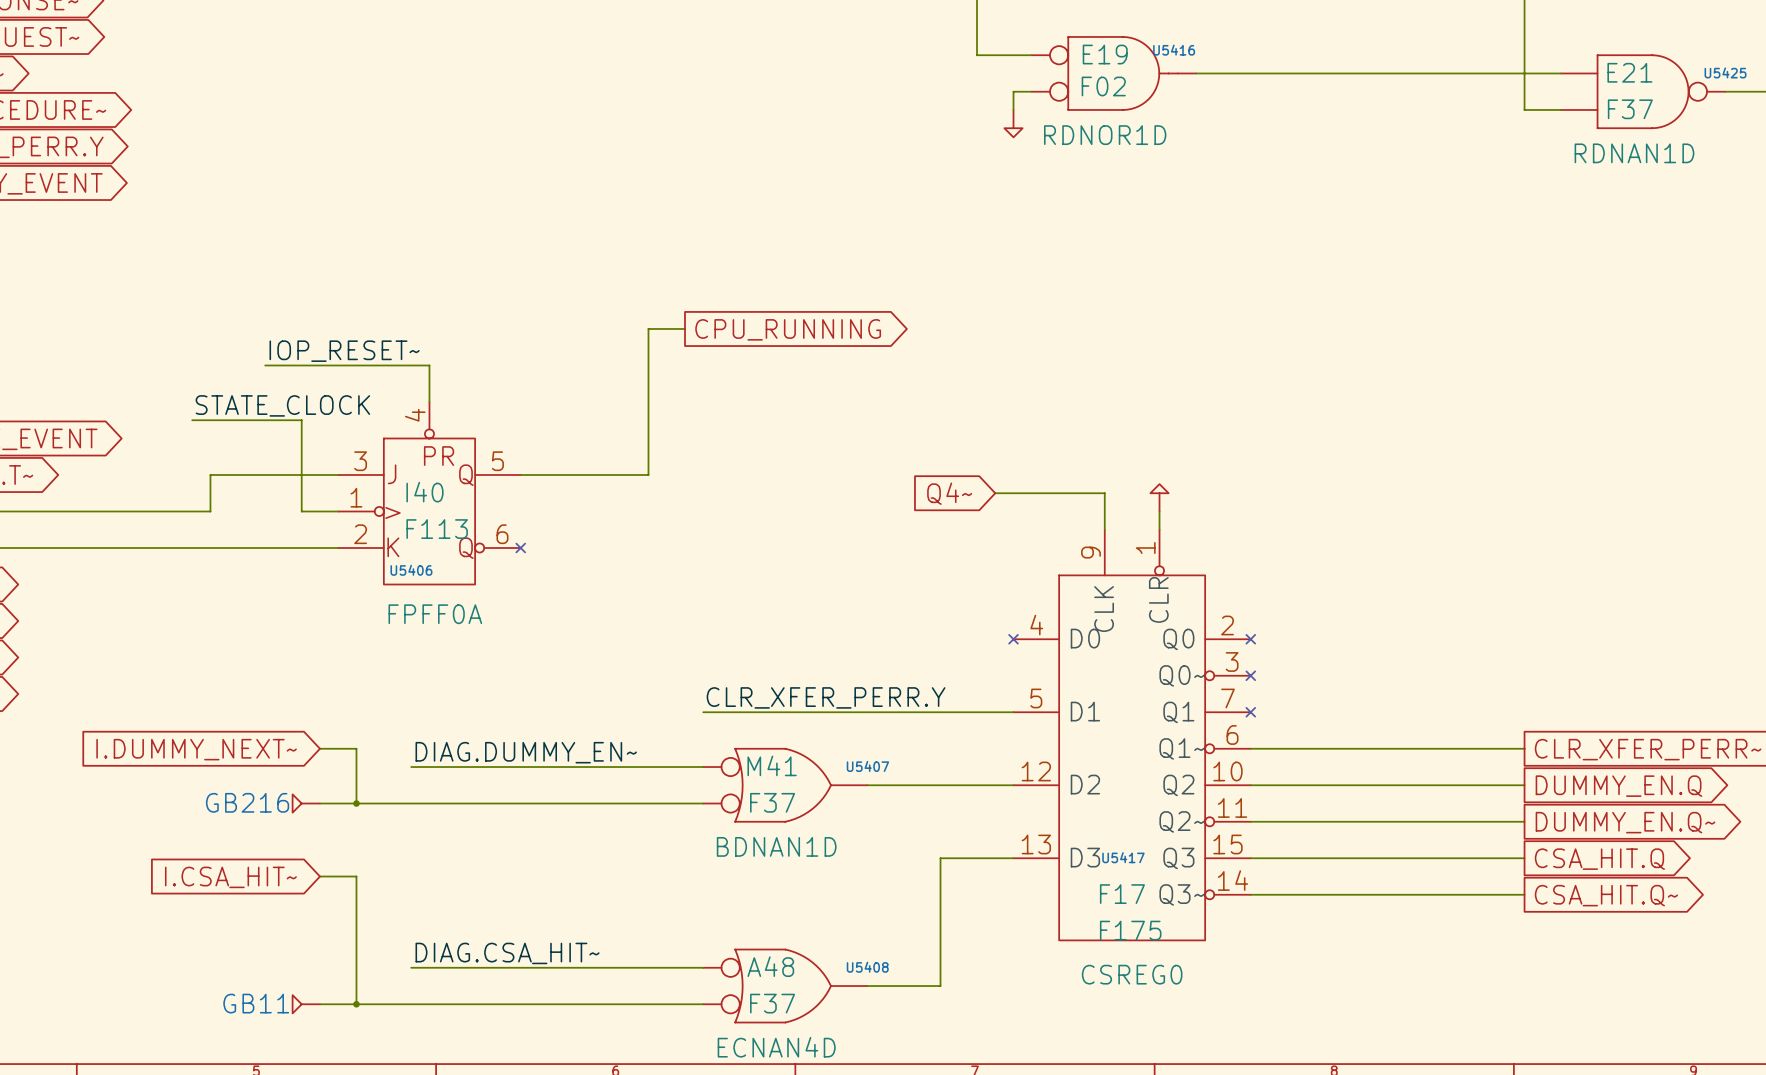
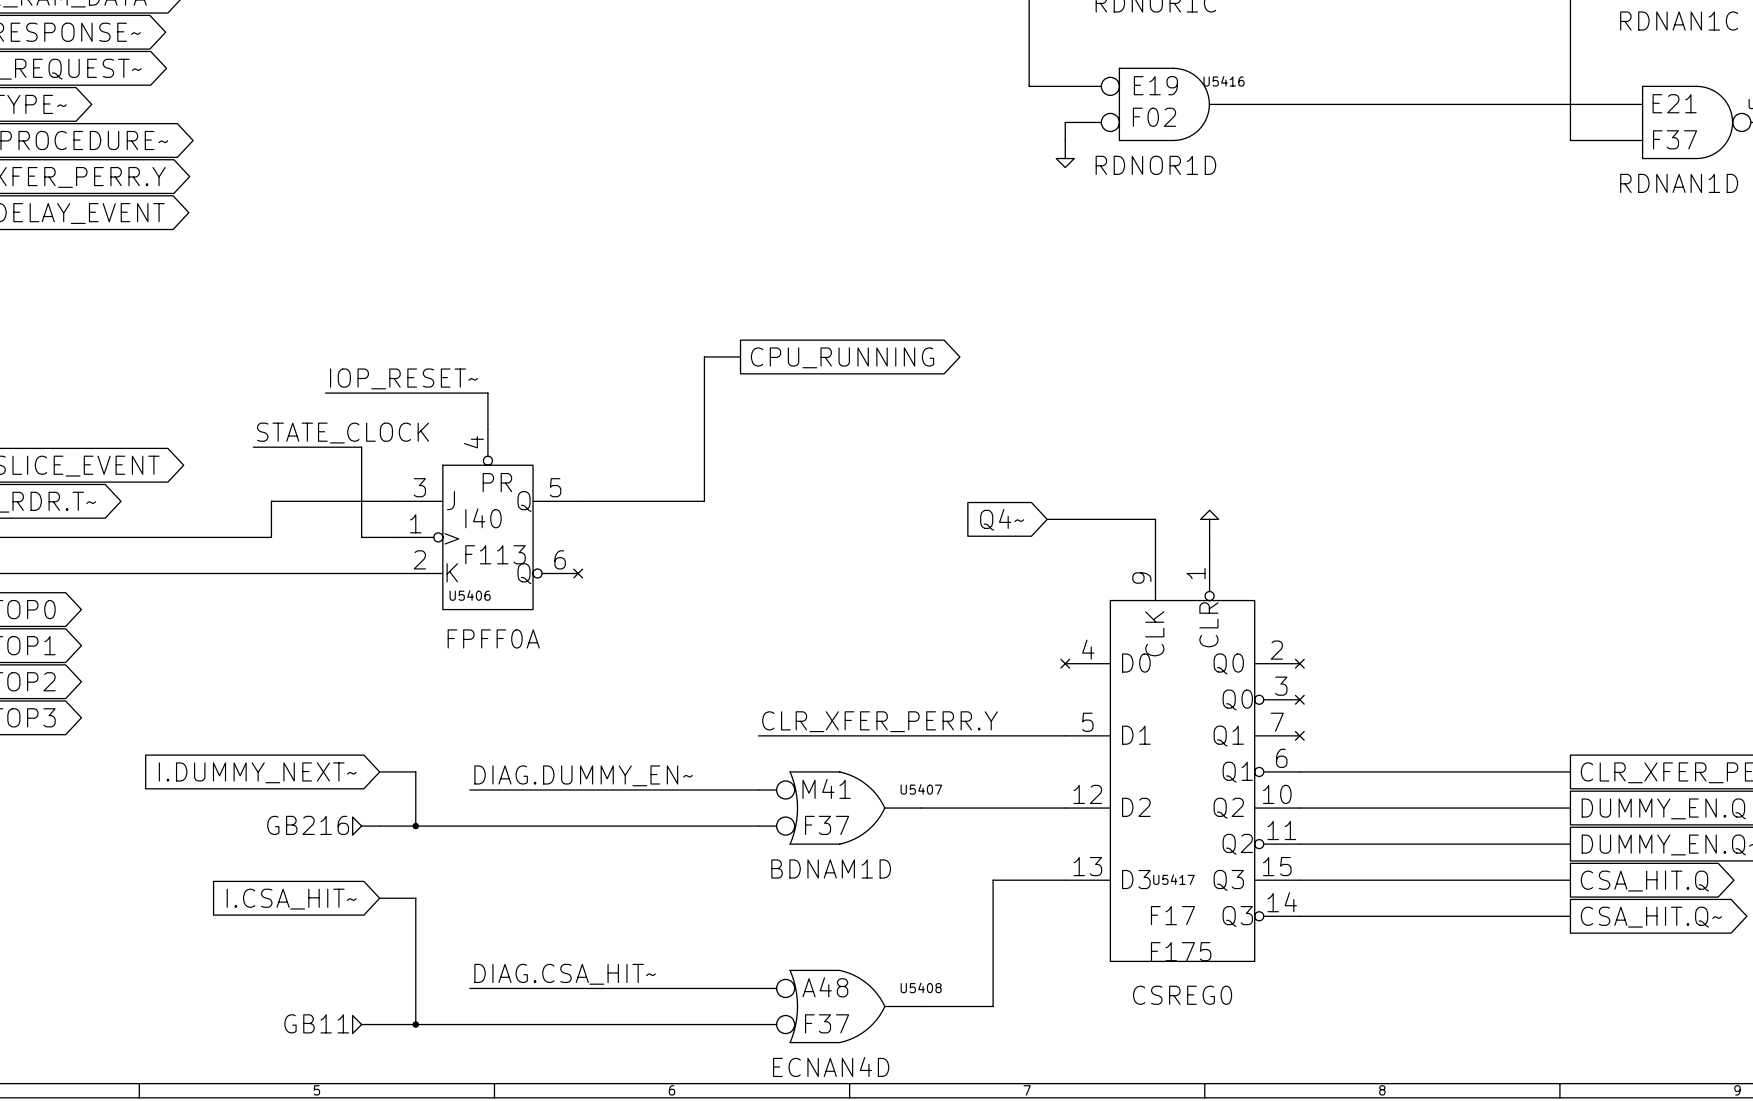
U5417 pin name: Q0~ (1181, 675) -> Q0 (1237, 699)
U5417 pin name: Q1~ (1181, 748) -> Q1 (1237, 772)
U5417 pin name: Q2~ (1181, 821) -> Q2 (1237, 844)
U5407 text: BDNAN1D (776, 846) -> BDNAM1D (831, 868)
U5417 pin name: Q3~ (1181, 894) -> Q3 (1237, 916)

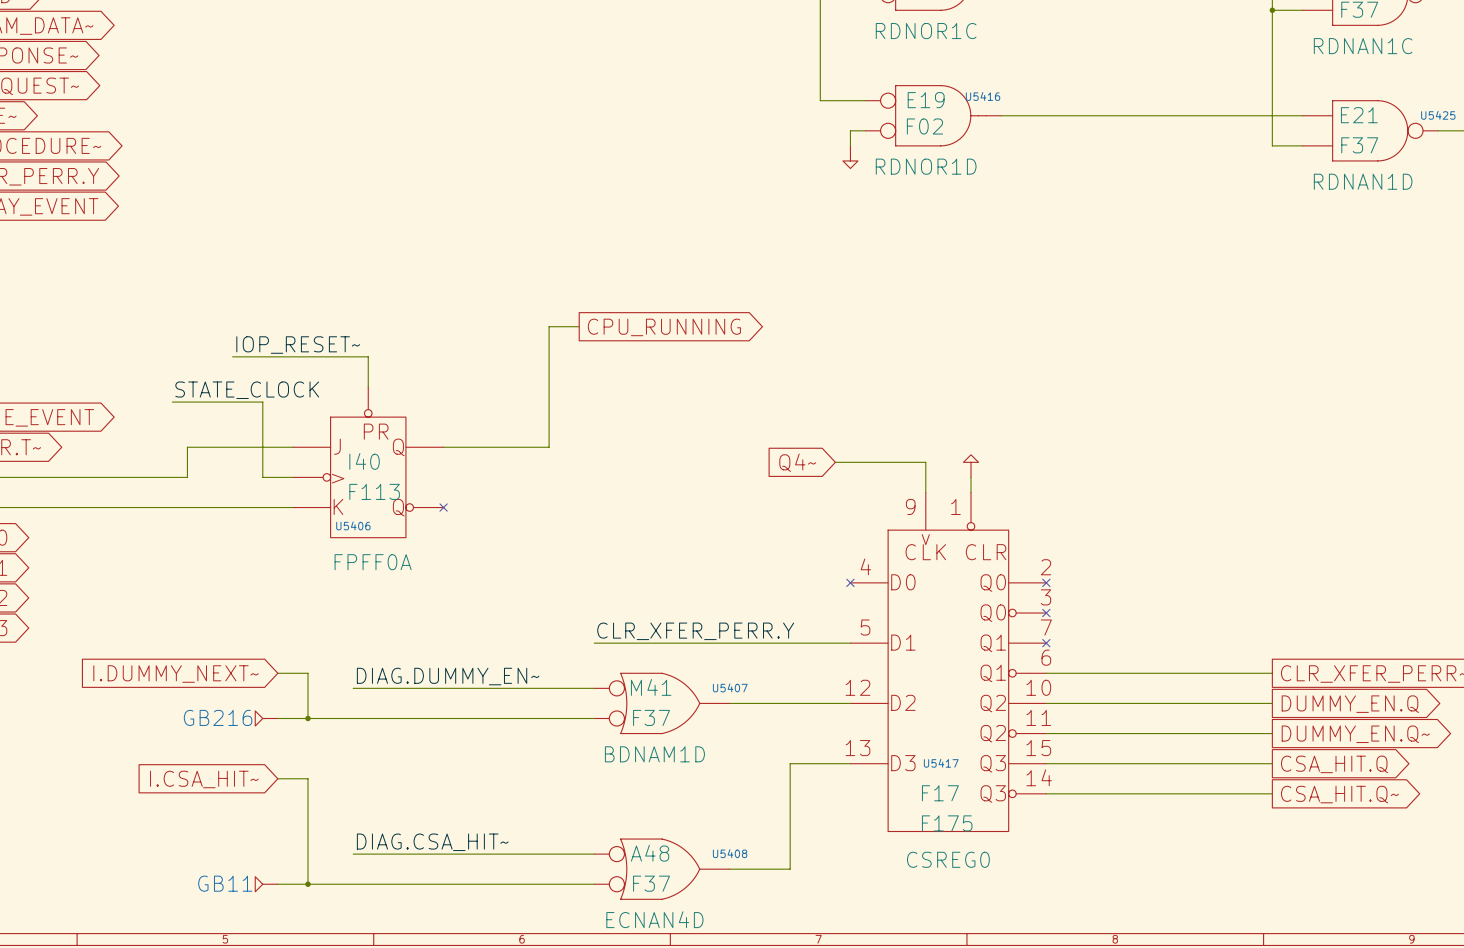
U5406 pin number: 4 (473, 442) -> none
U5406 pin number: 3 (419, 487) -> none
U5406 pin number: 5 (555, 487) -> none
U5406 pin number: 1 (415, 523) -> none
U5417 symbol: [1065, 555, 1300, 962] -> [850, 492, 1047, 832]
U5406 pin number: 2 (419, 559) -> none
U5406 pin number: 6 (560, 559) -> none

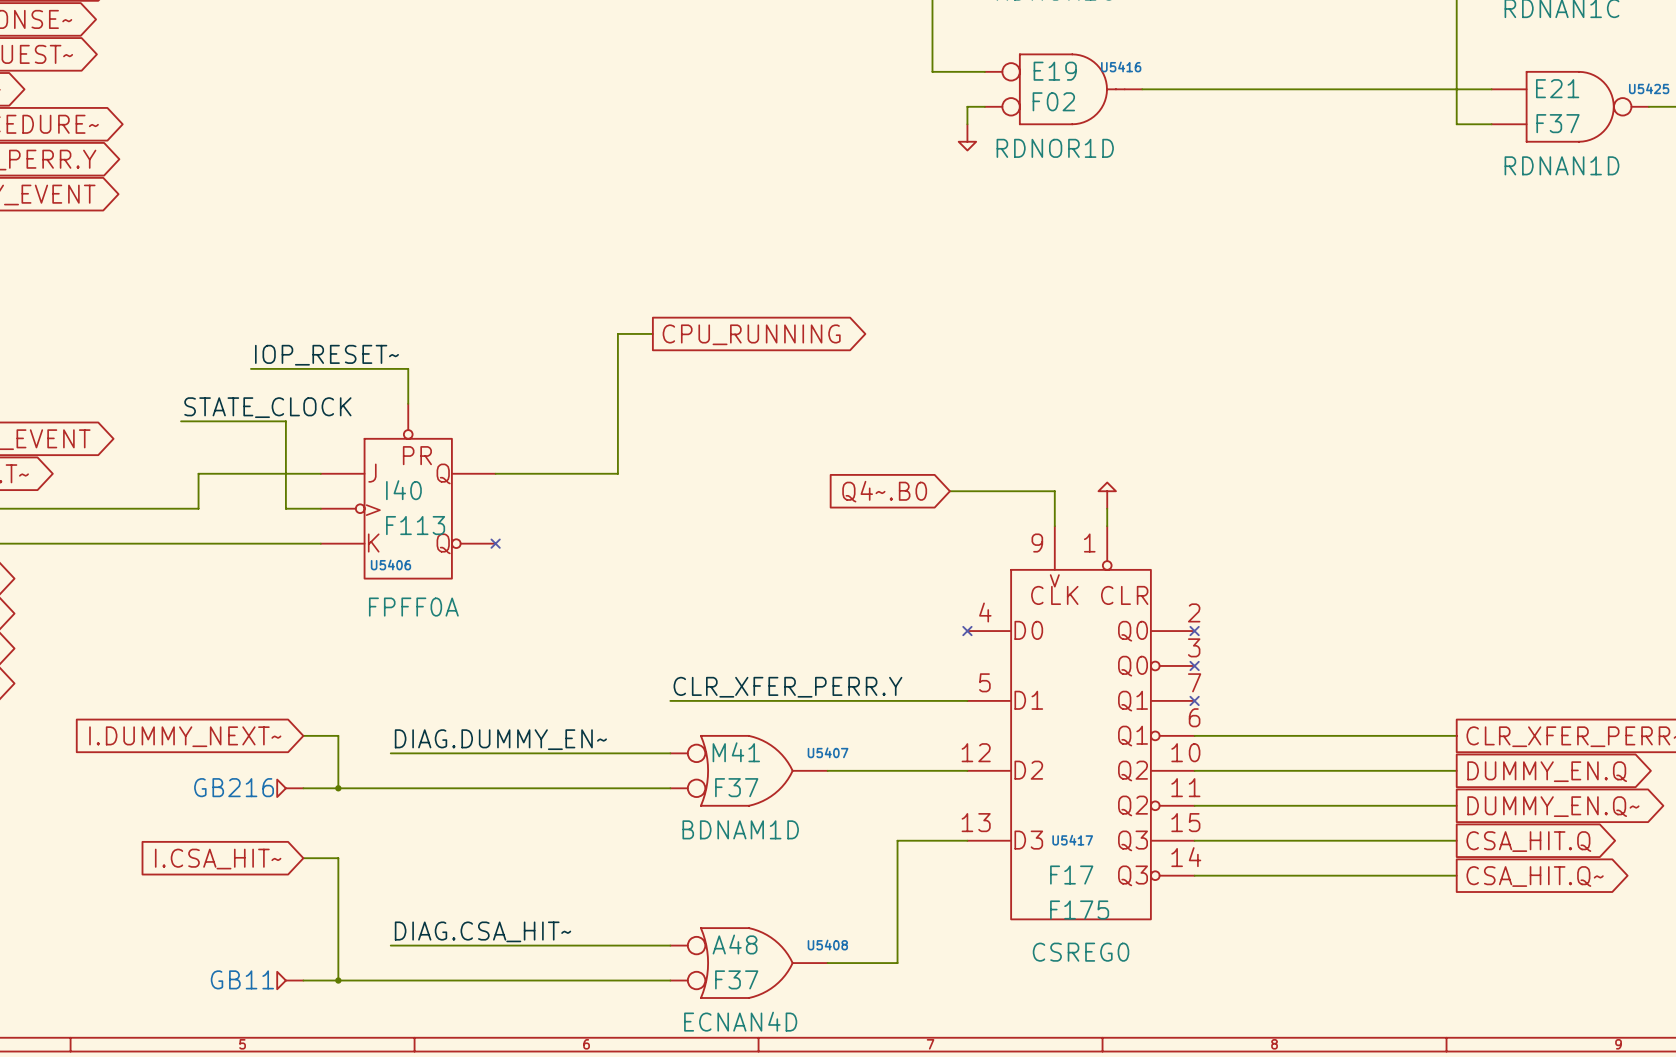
global label: Q4~ (797, 462) -> Q4~.B0 (884, 491)

